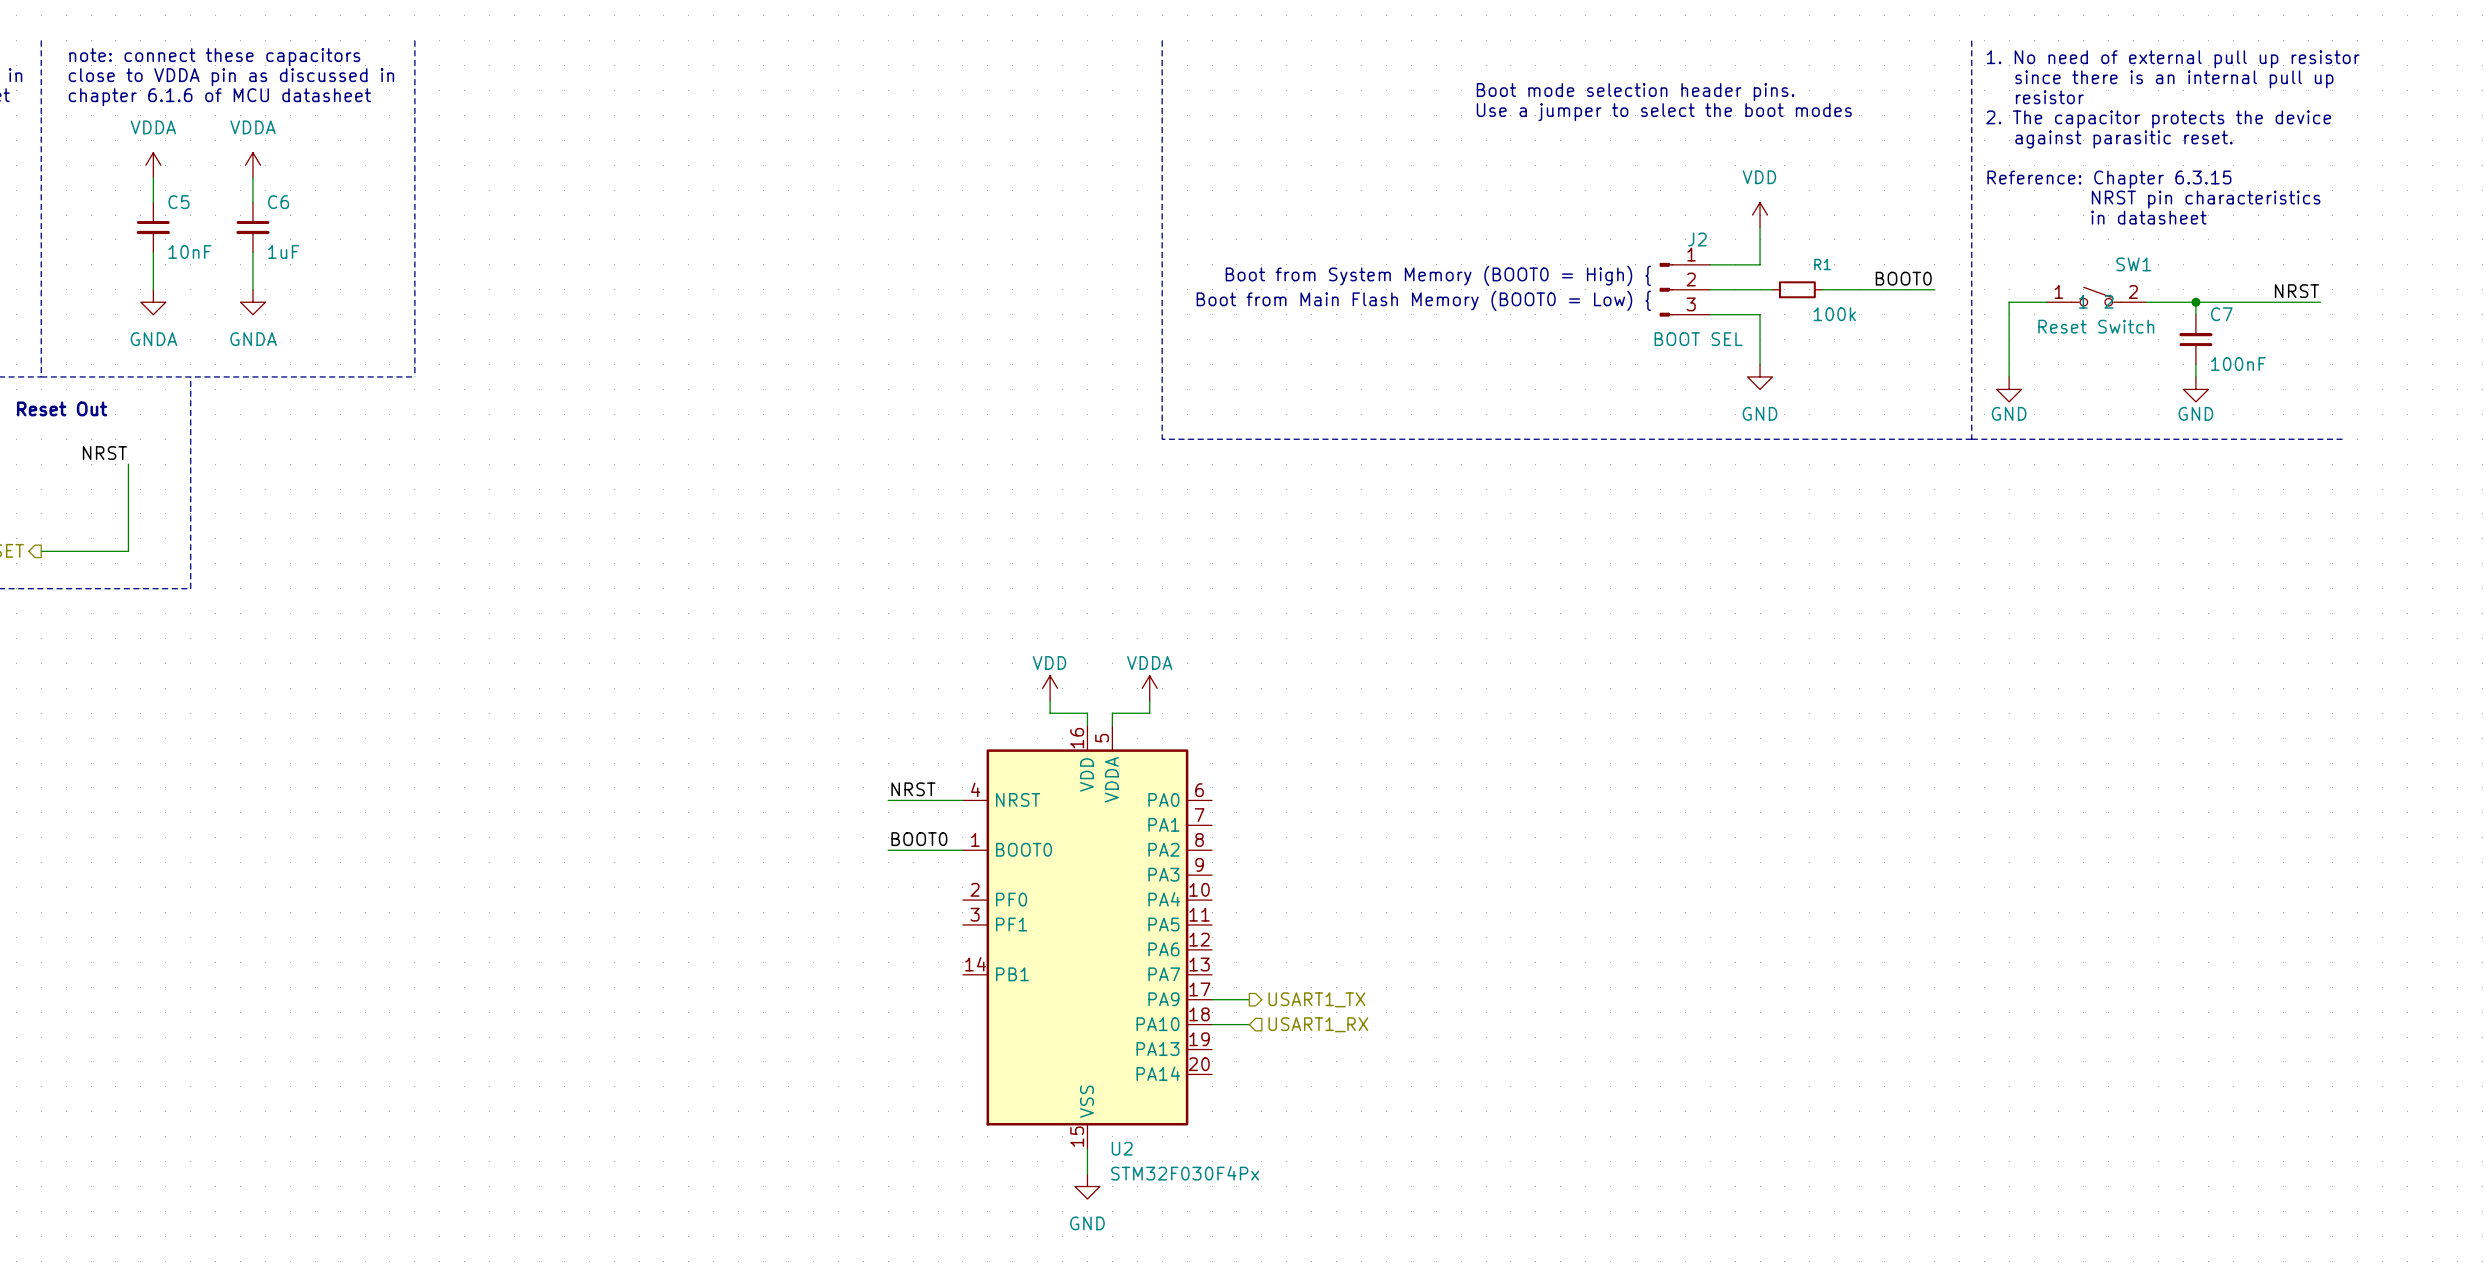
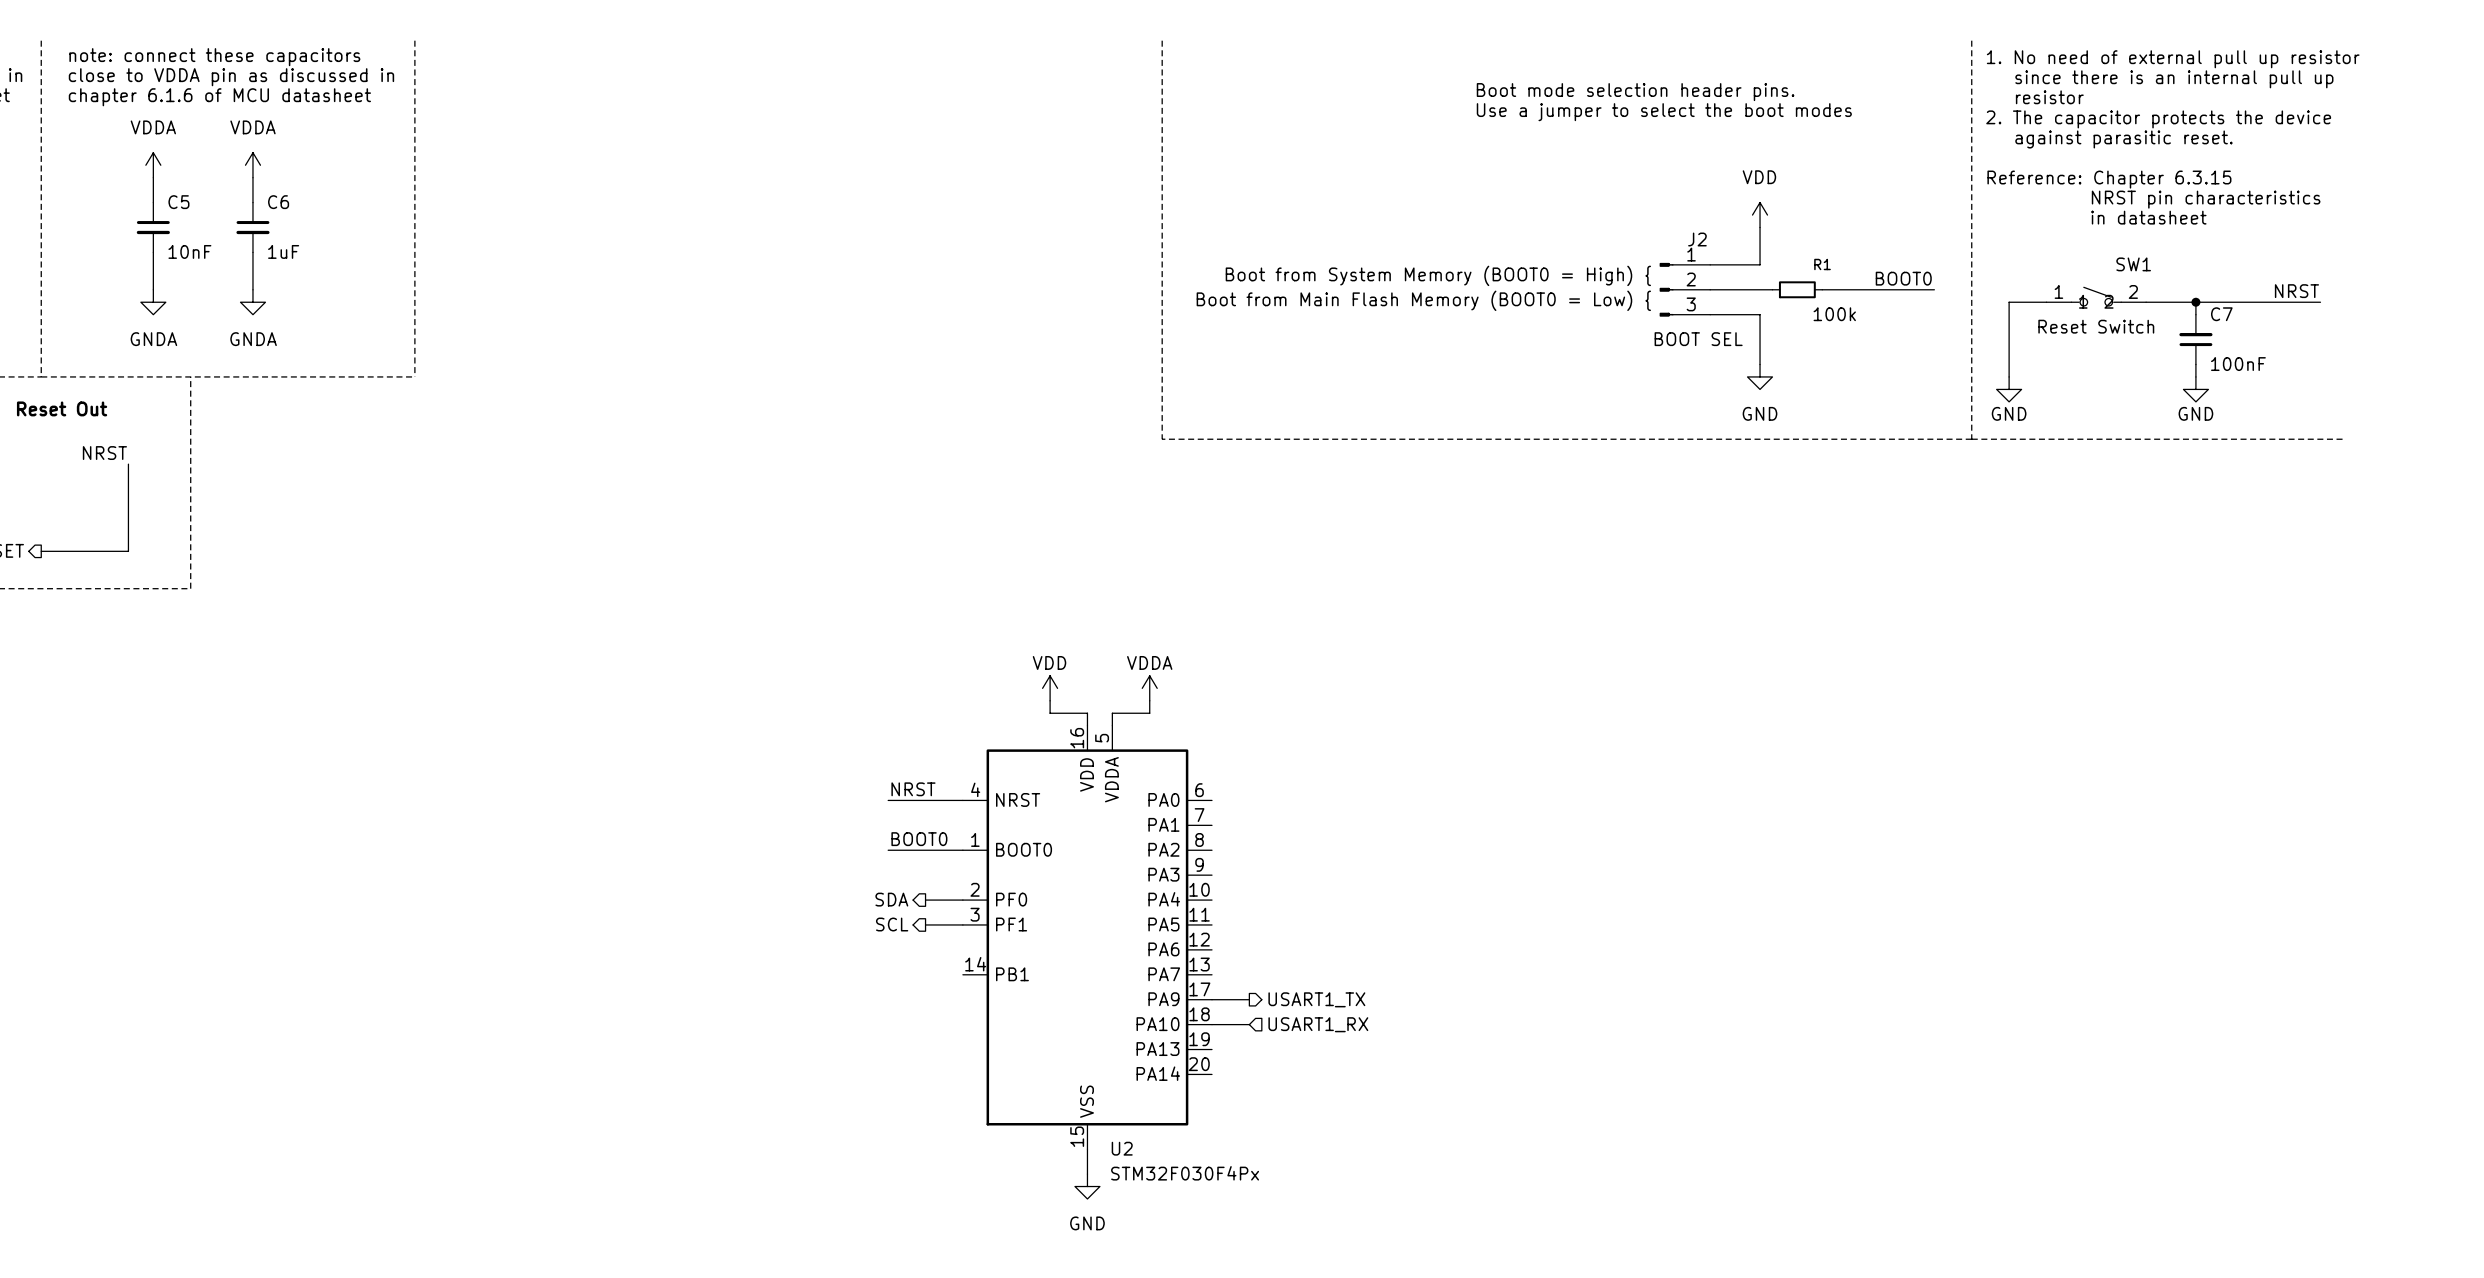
hierarchical label: none -> SDA (891, 899)
wire: none -> (925, 900) (962, 900)
hierarchical label: none -> SCL (892, 924)
wire: none -> (925, 924) (962, 924)

